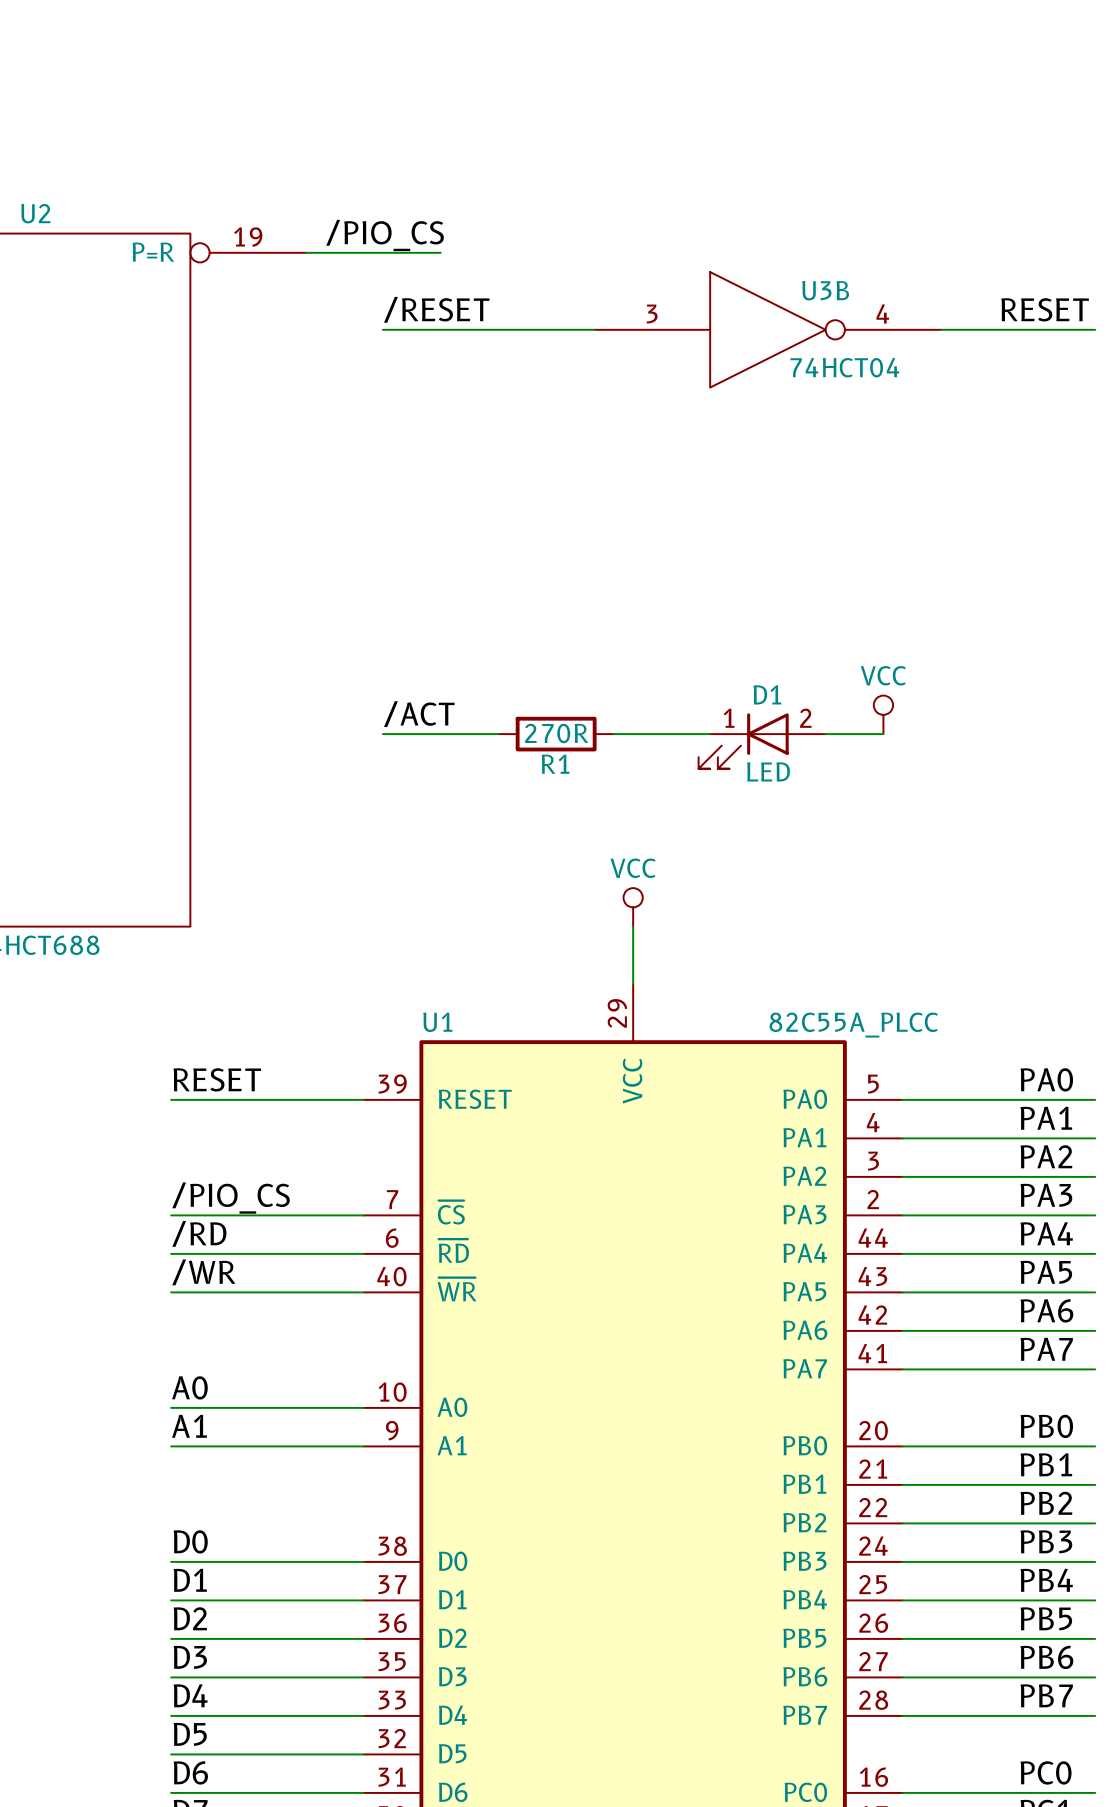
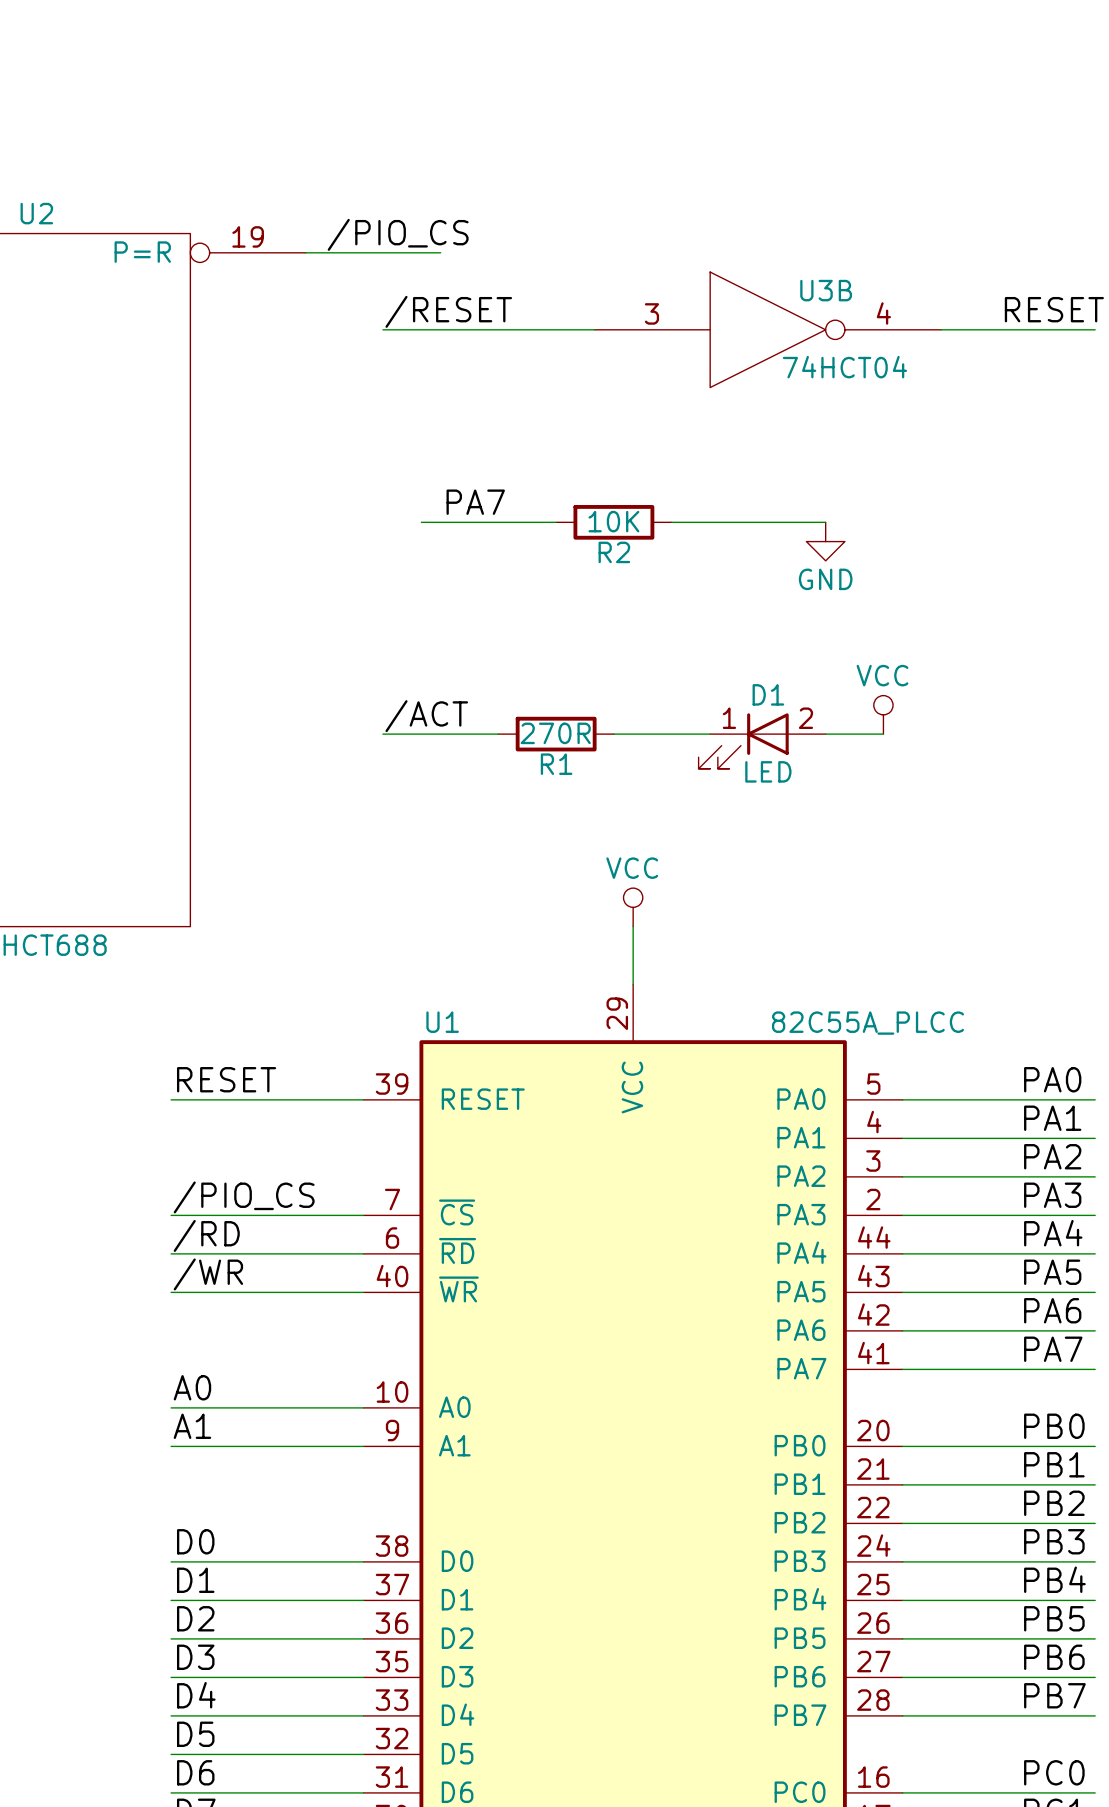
label: none -> PA7 (475, 502)
wire: none -> (421, 522) (556, 522)
R2: none -> 10K (613, 522)
wire: none -> (671, 522) (825, 522)
power symbol: none -> GND (825, 541)

